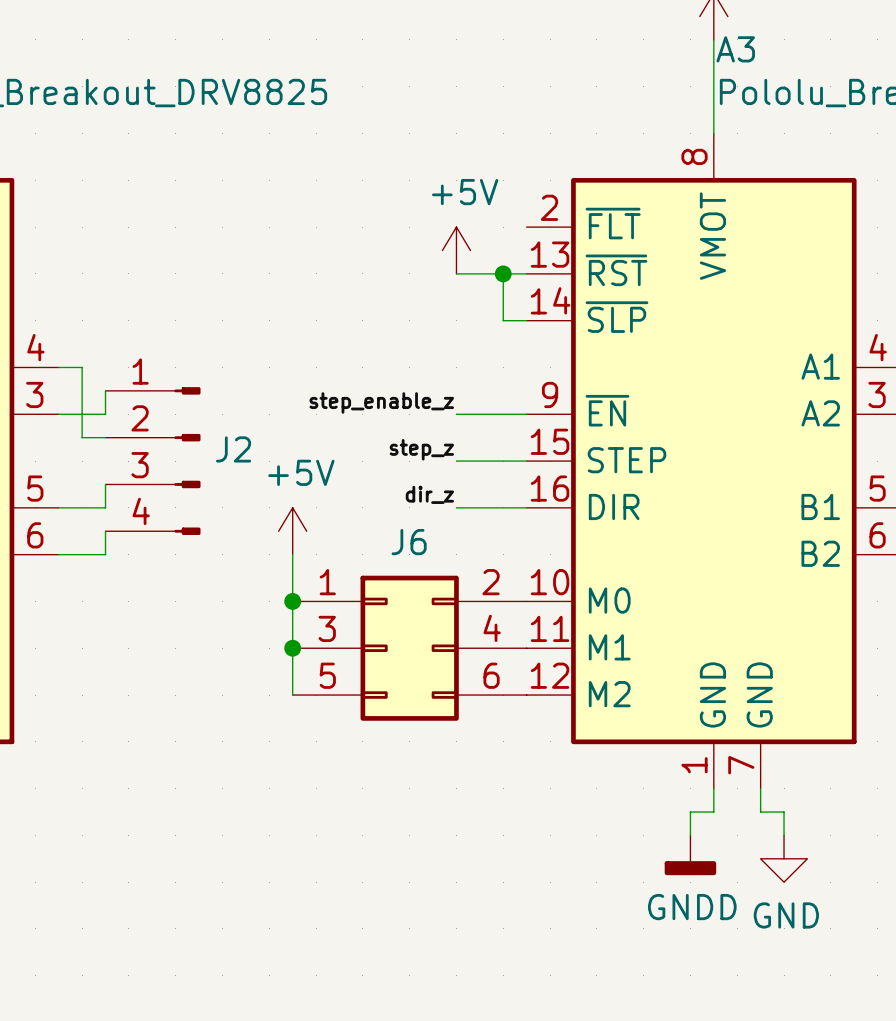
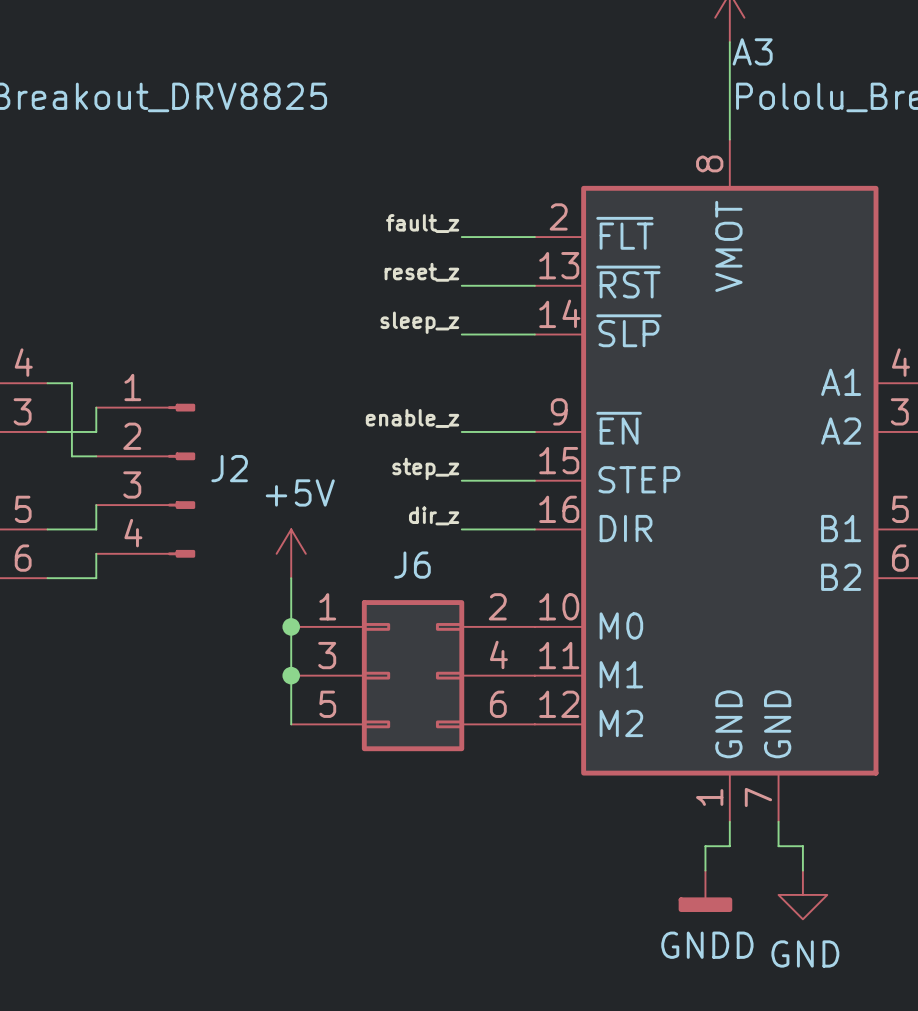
label: none -> fault_z (422, 223)
wire: none -> (461, 237) (534, 237)
power symbol: +5V (456, 250) -> none
label: none -> reset_z (421, 272)
wire: (503, 273) (503, 320) -> (461, 334) (510, 334)
junction: (503, 273) -> none
label: none -> sleep_z (419, 322)
label: step_enable_z (381, 402) -> enable_z (412, 418)

